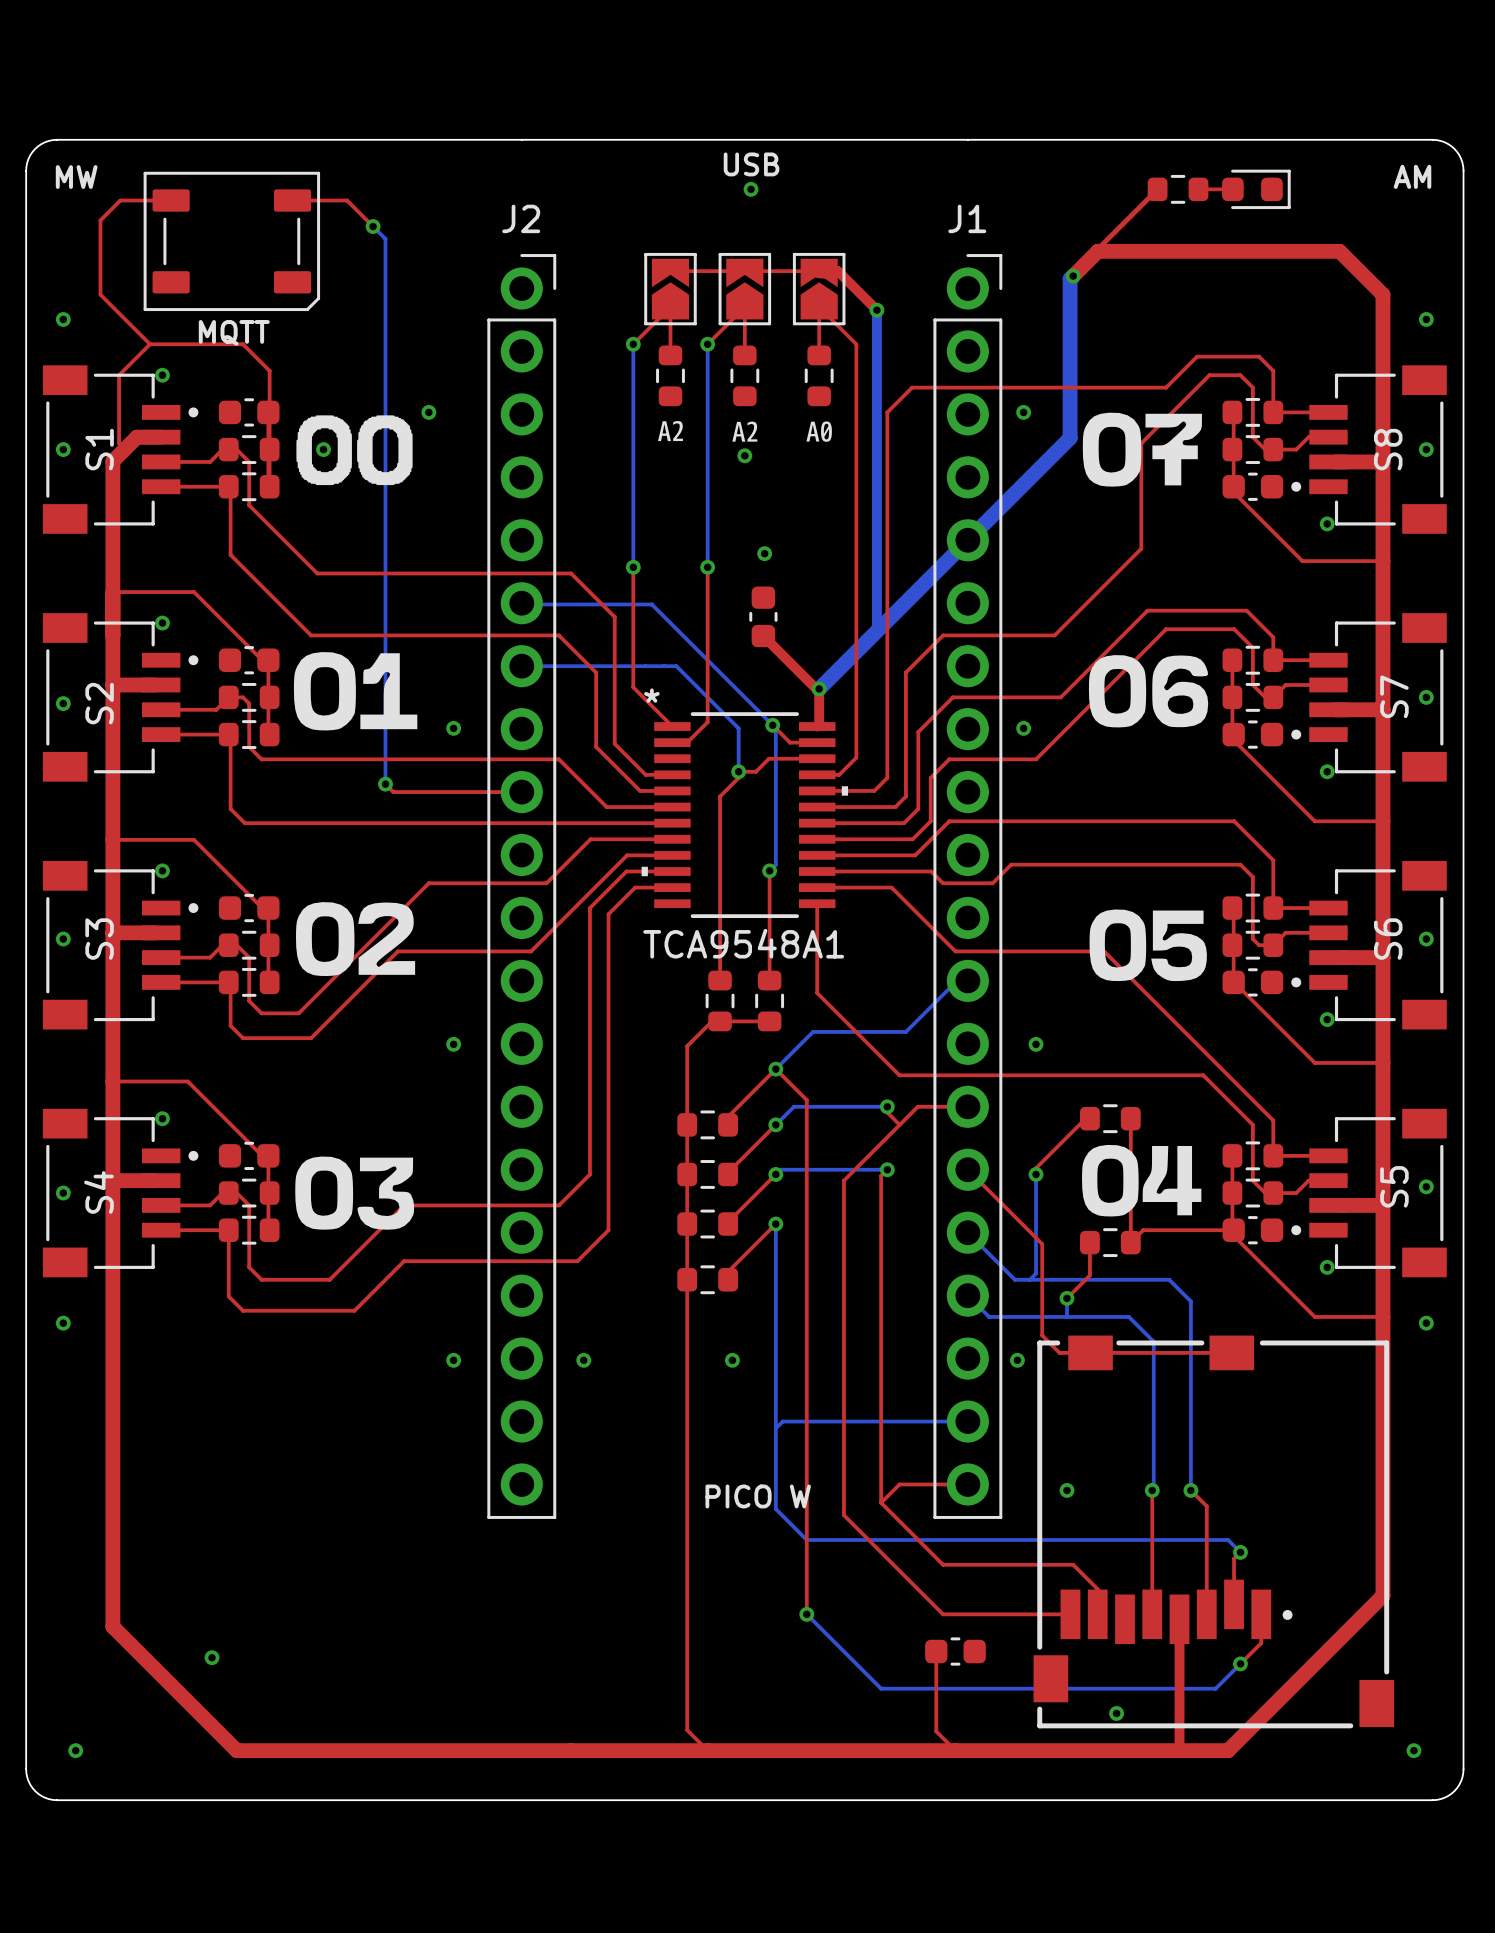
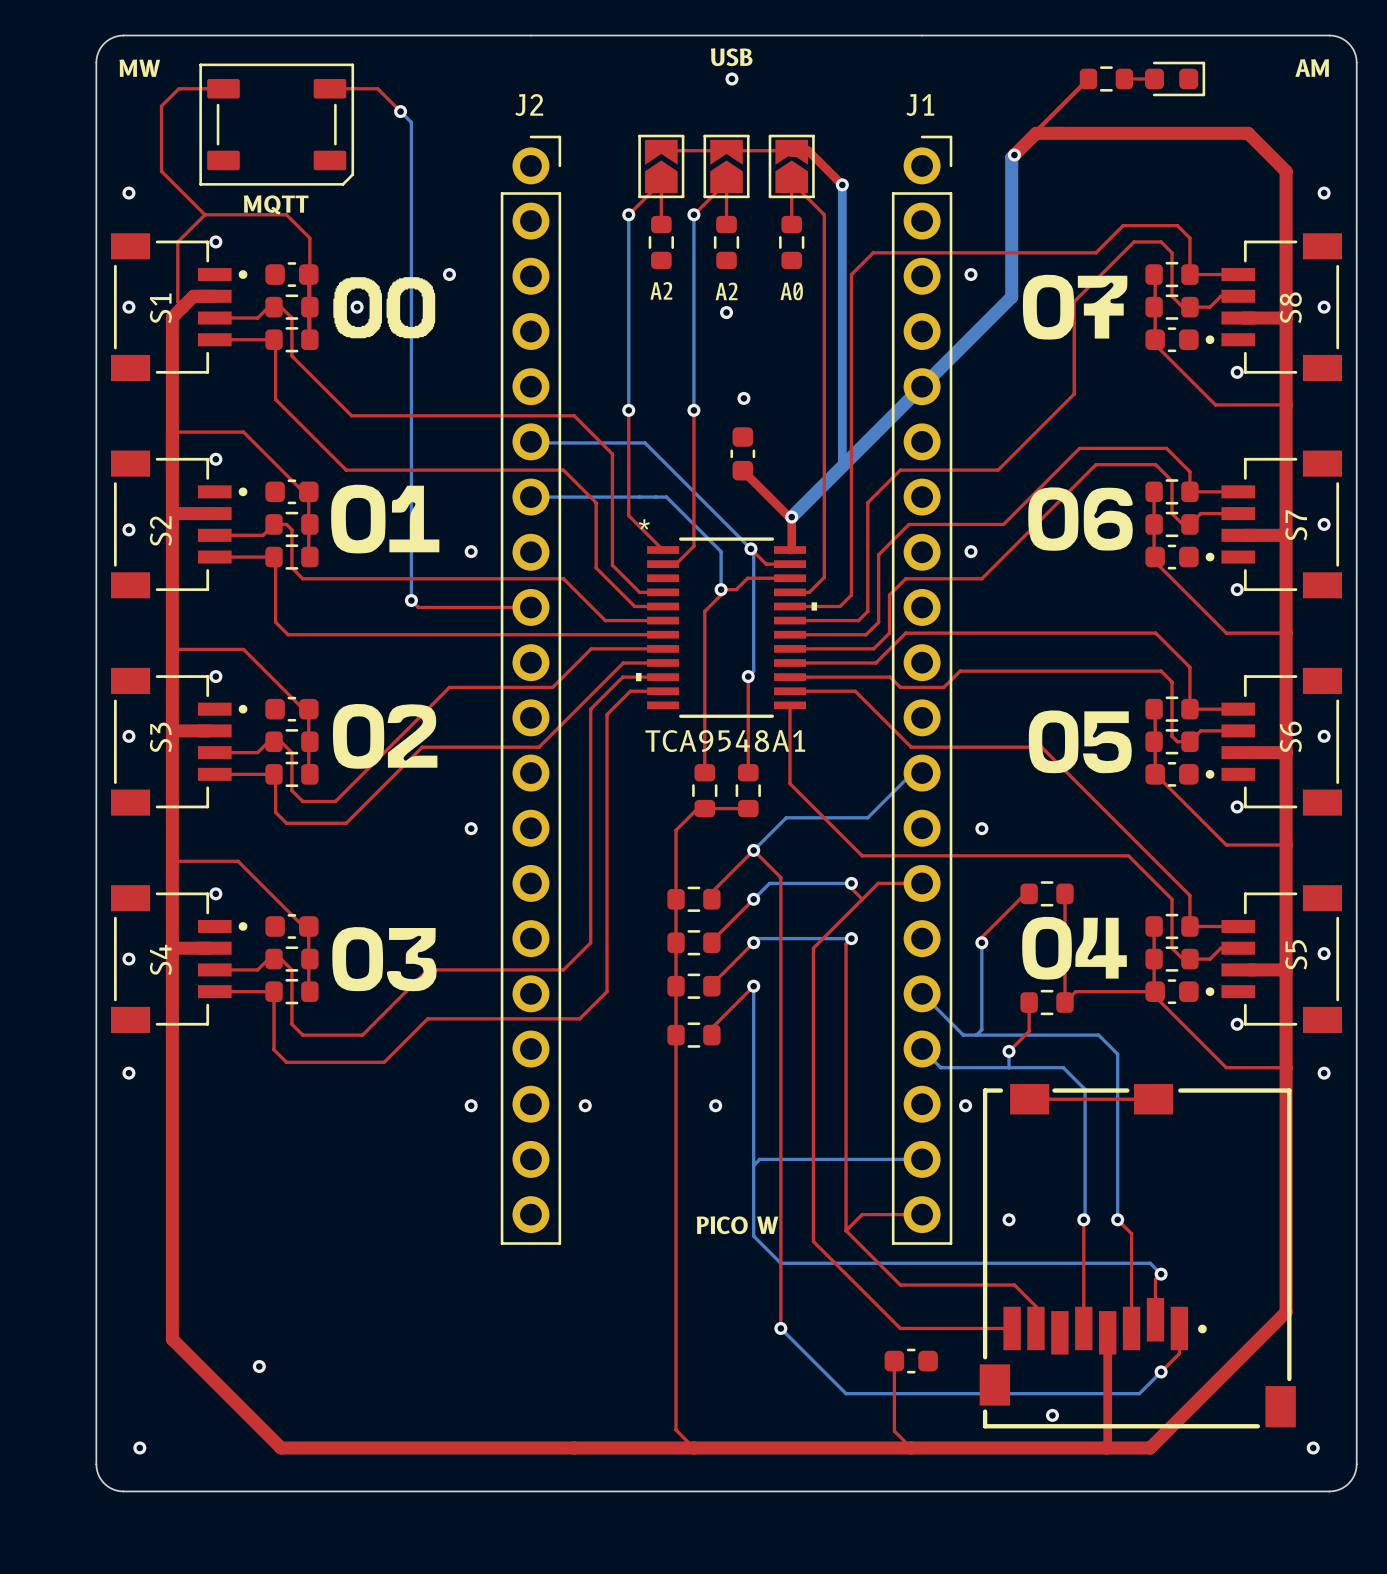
top track: (967, 1169) (1042, 1244) (1042, 1335) (1059, 1352) (1085, 1352) -> none

